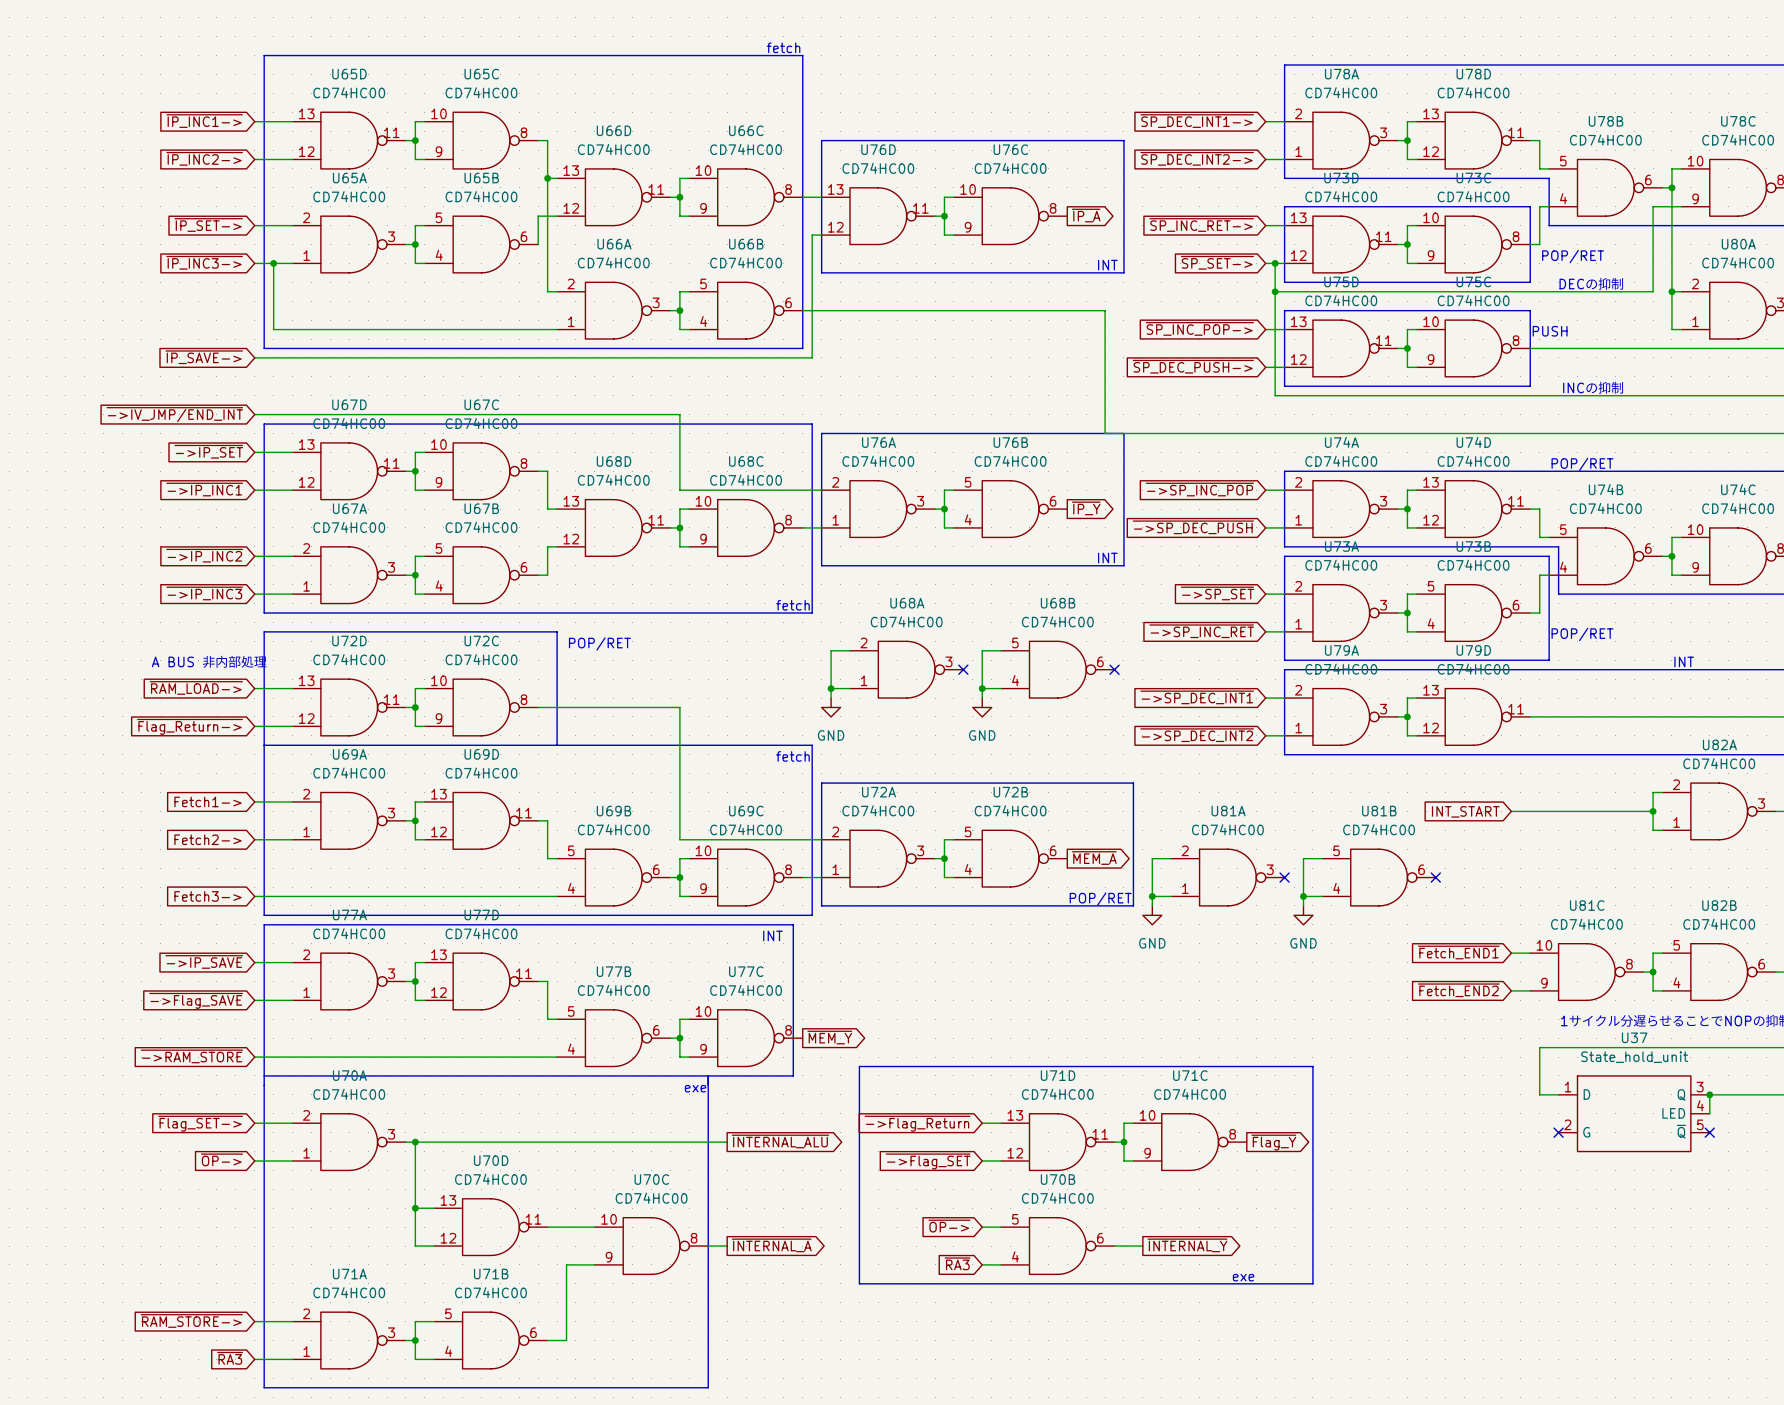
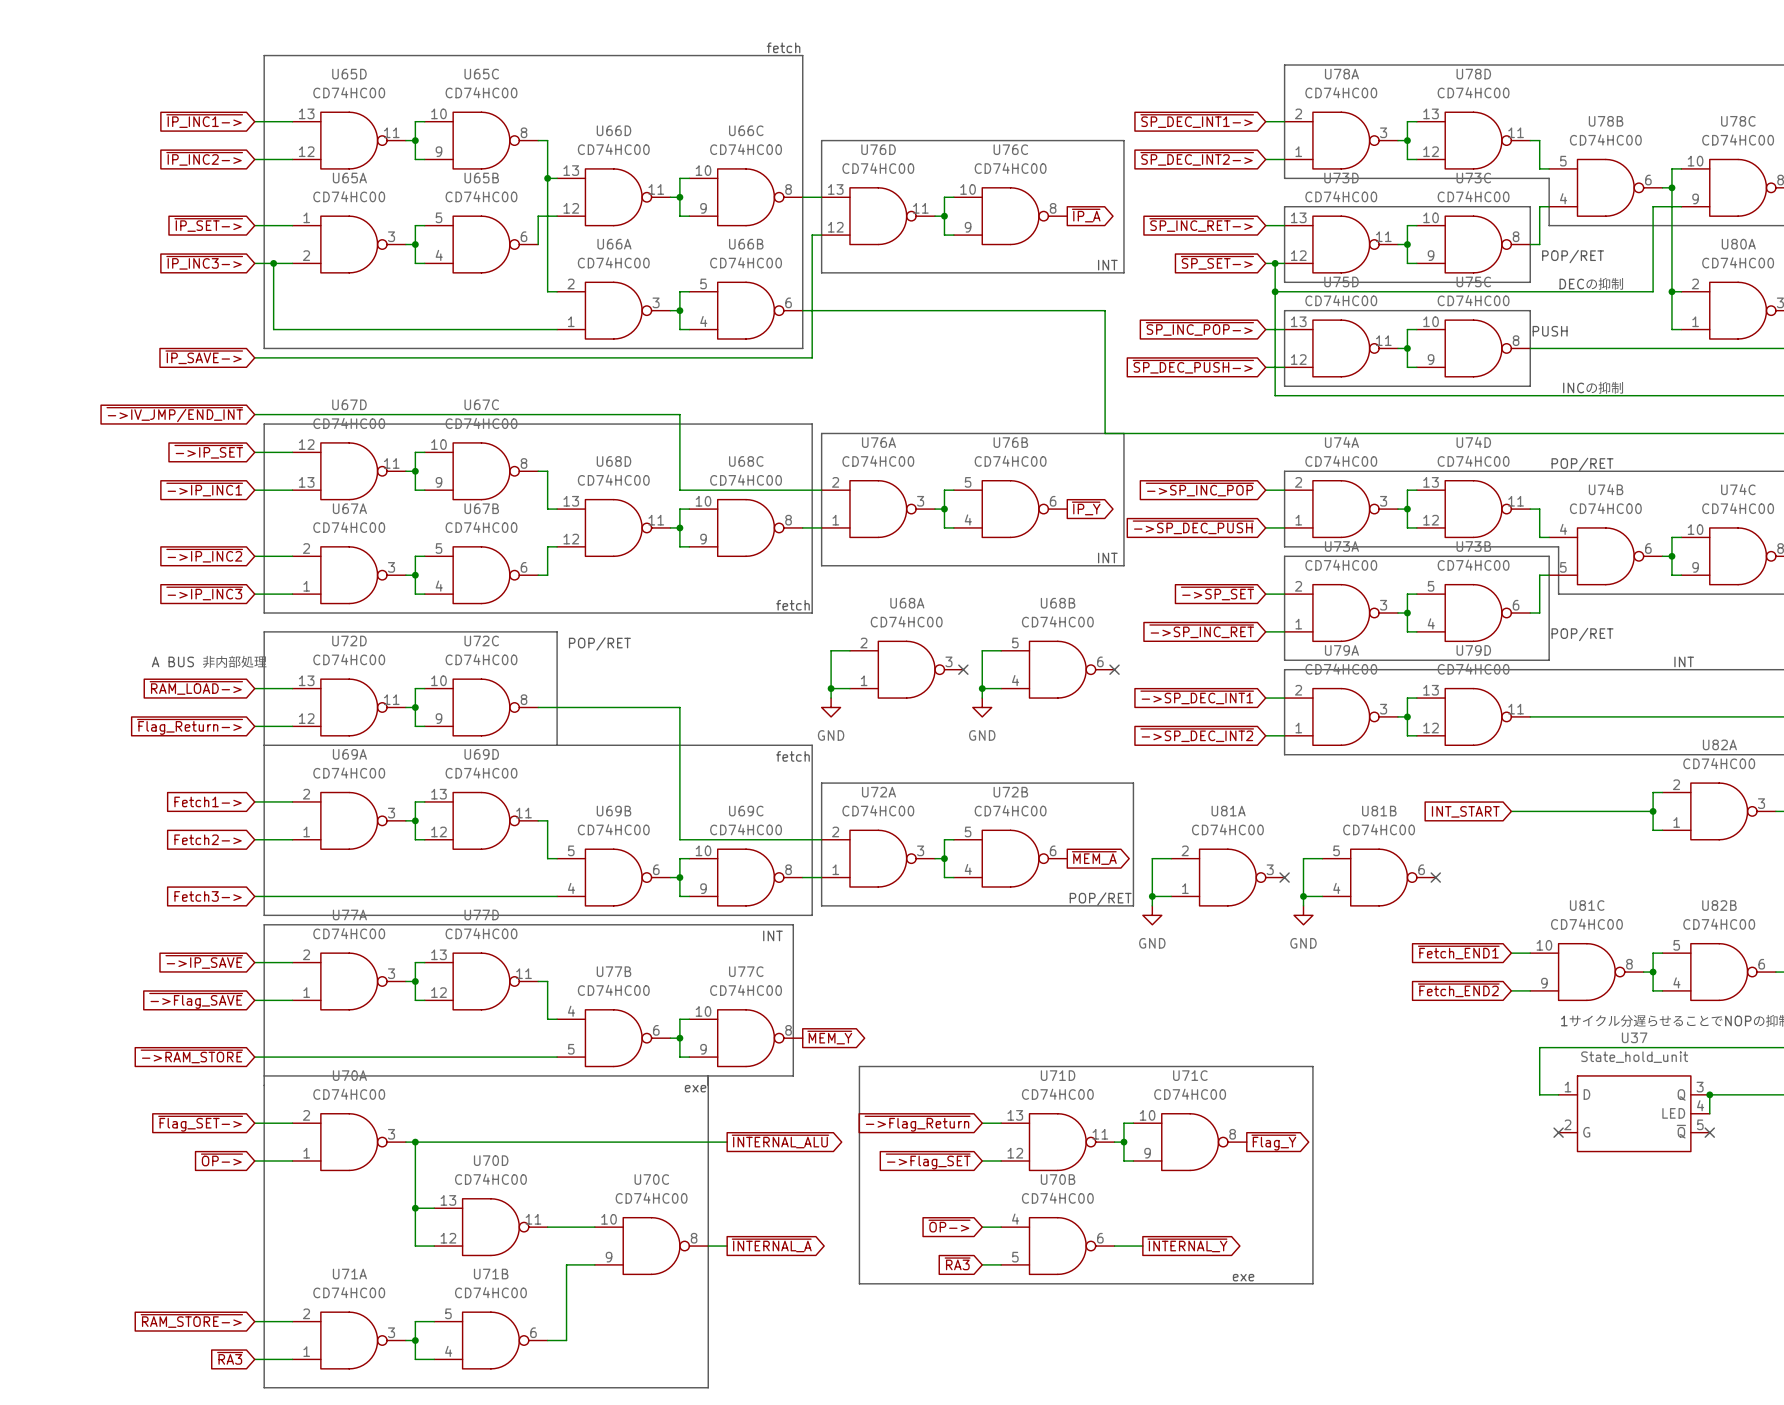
U65A flip: as is (349, 244) -> up-down (349, 244)
U67D flip: as is (349, 471) -> up-down (349, 471)
U74B flip: as is (1605, 556) -> up-down (1605, 556)
U77B flip: as is (613, 1038) -> up-down (613, 1038)
U70B flip: as is (1057, 1246) -> up-down (1057, 1246)

